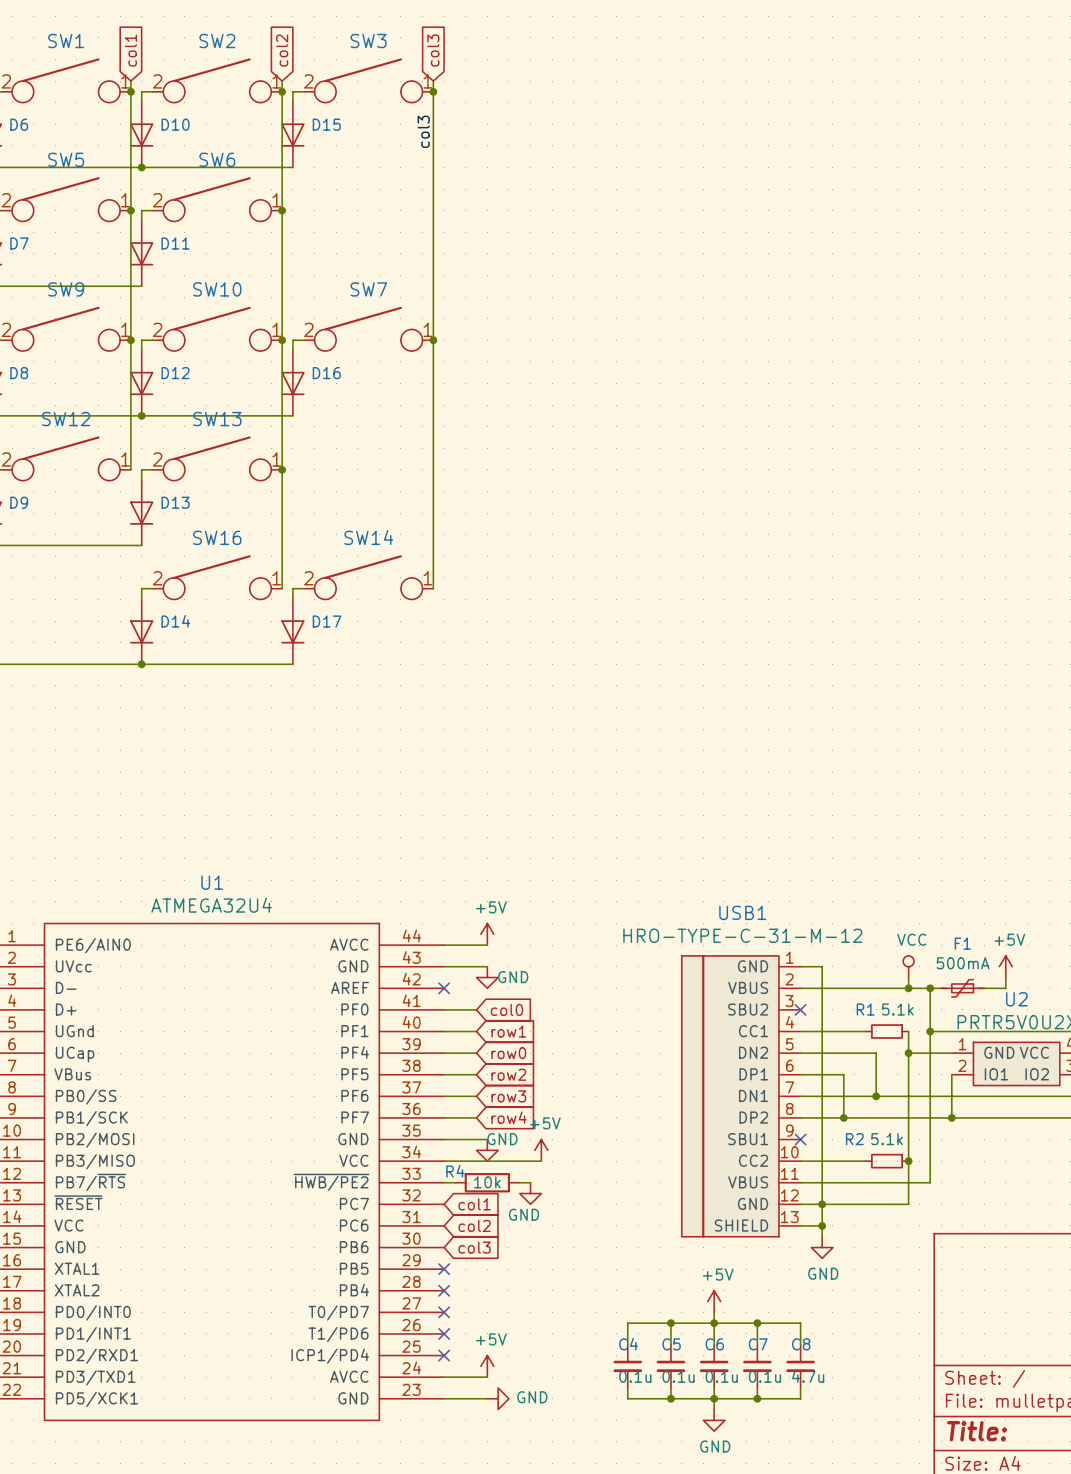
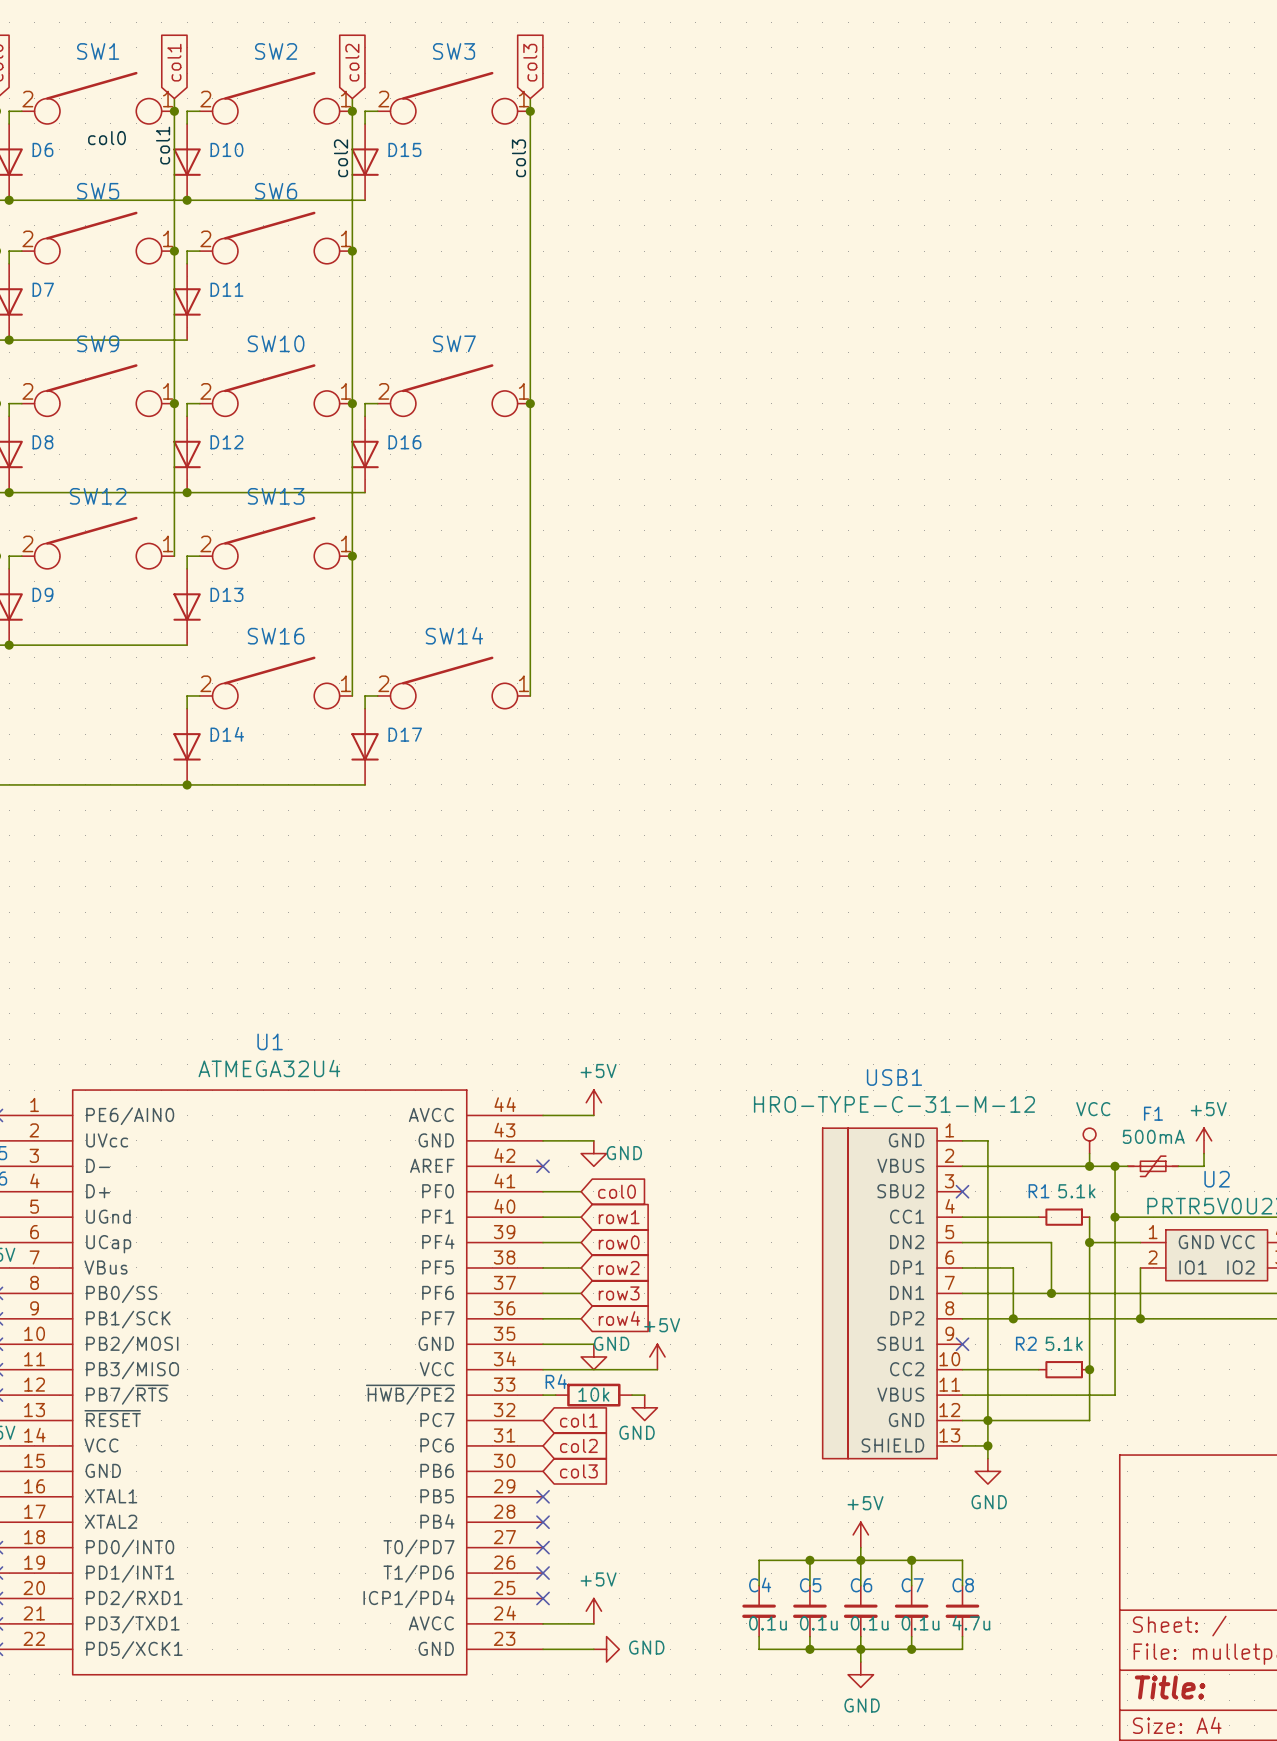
label: none -> col0 (107, 138)
label: none -> col1 (163, 145)
label: none -> col2 (341, 158)

